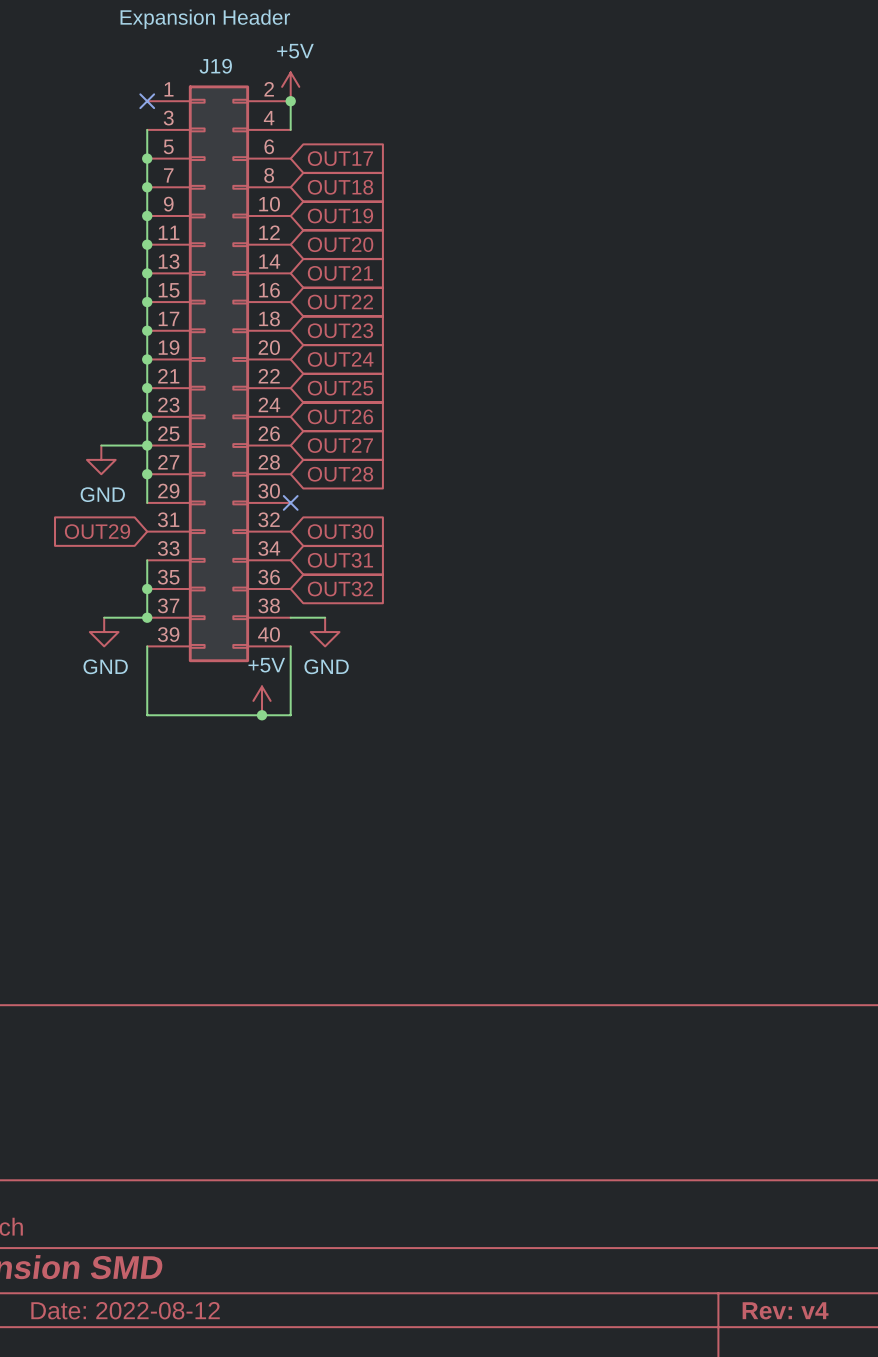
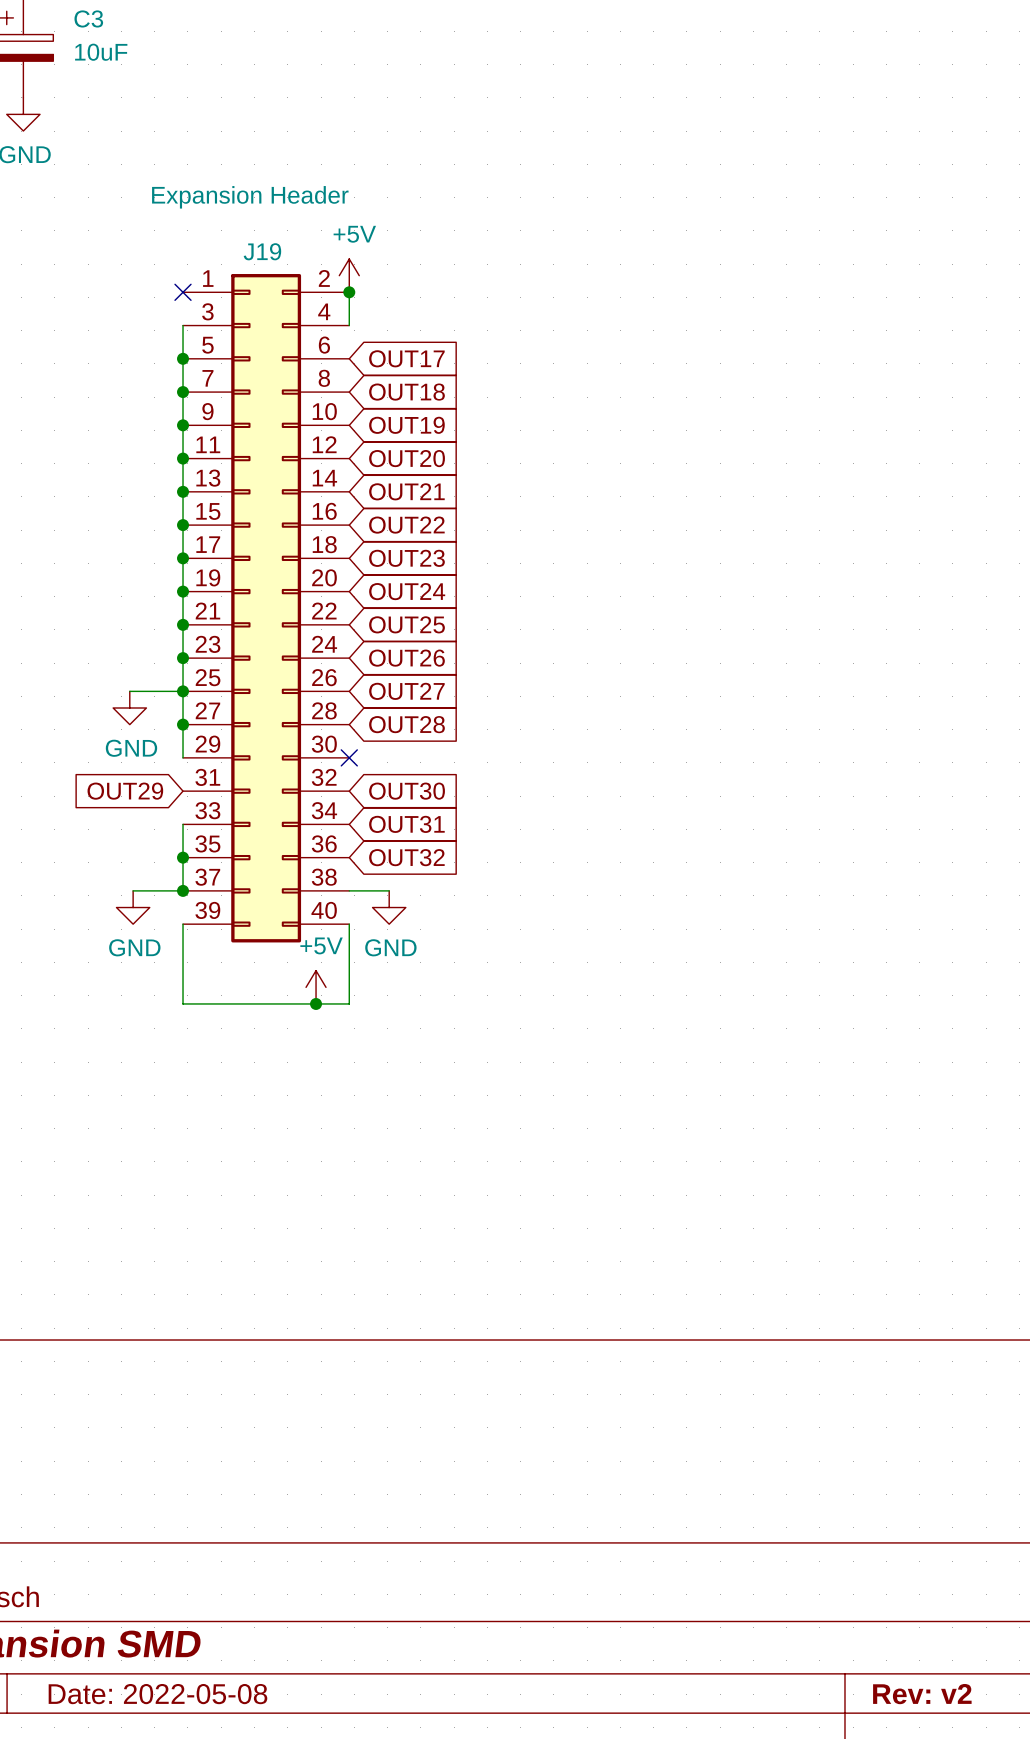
title block: Date: 2022-08-12 (125, 1310) -> Date: 2022-05-08 (157, 1694)
title block: Rev: v4 (785, 1310) -> Rev: v2 (922, 1694)

